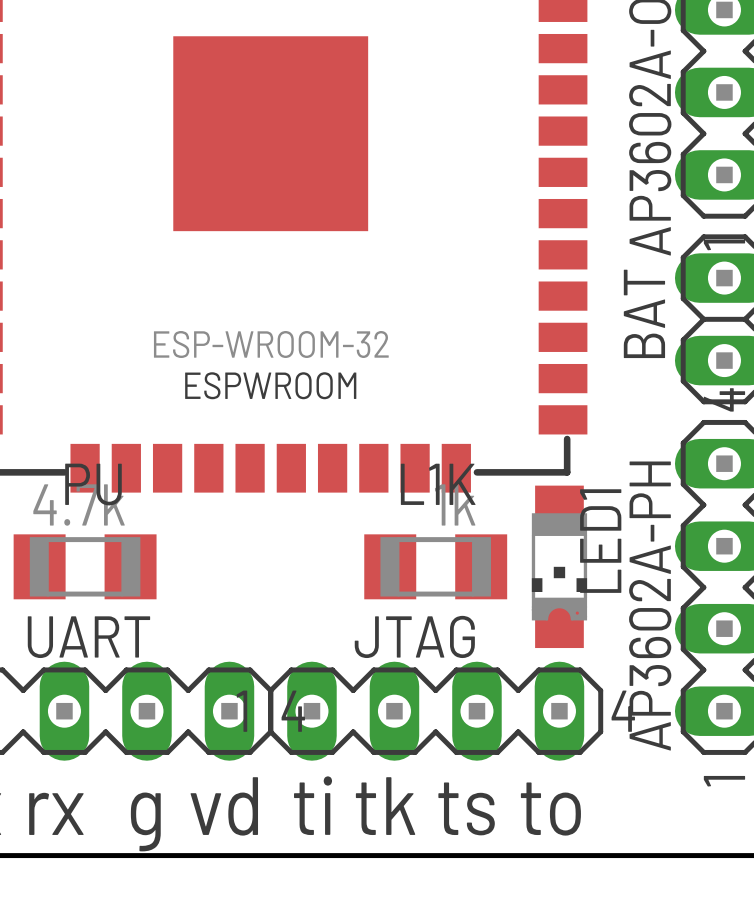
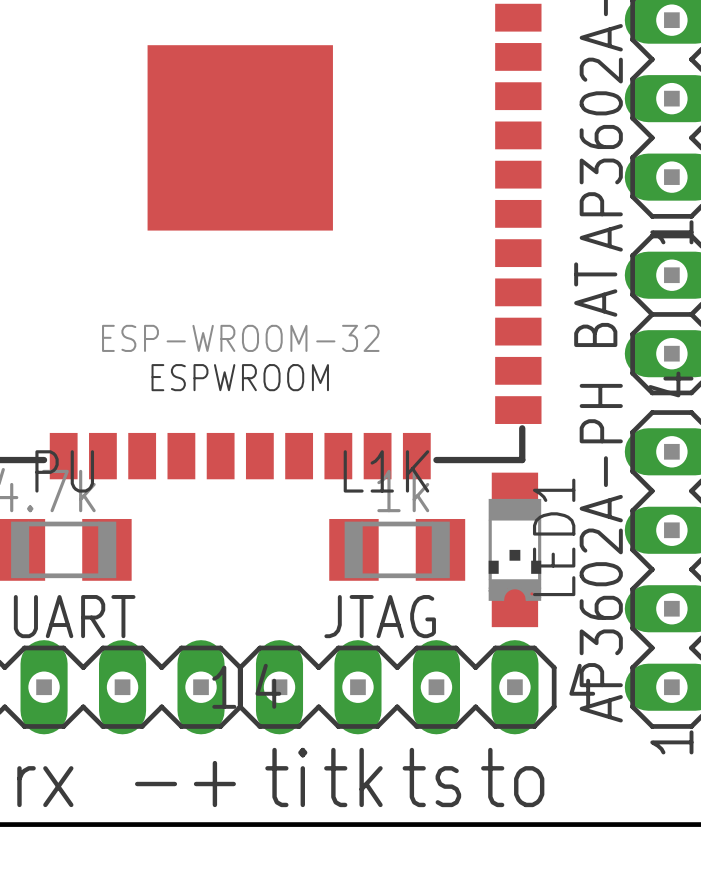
text: vd (224, 806) -> none
text: none -> + (214, 784)
text: none -> - (156, 784)
text: g (145, 821) -> none

